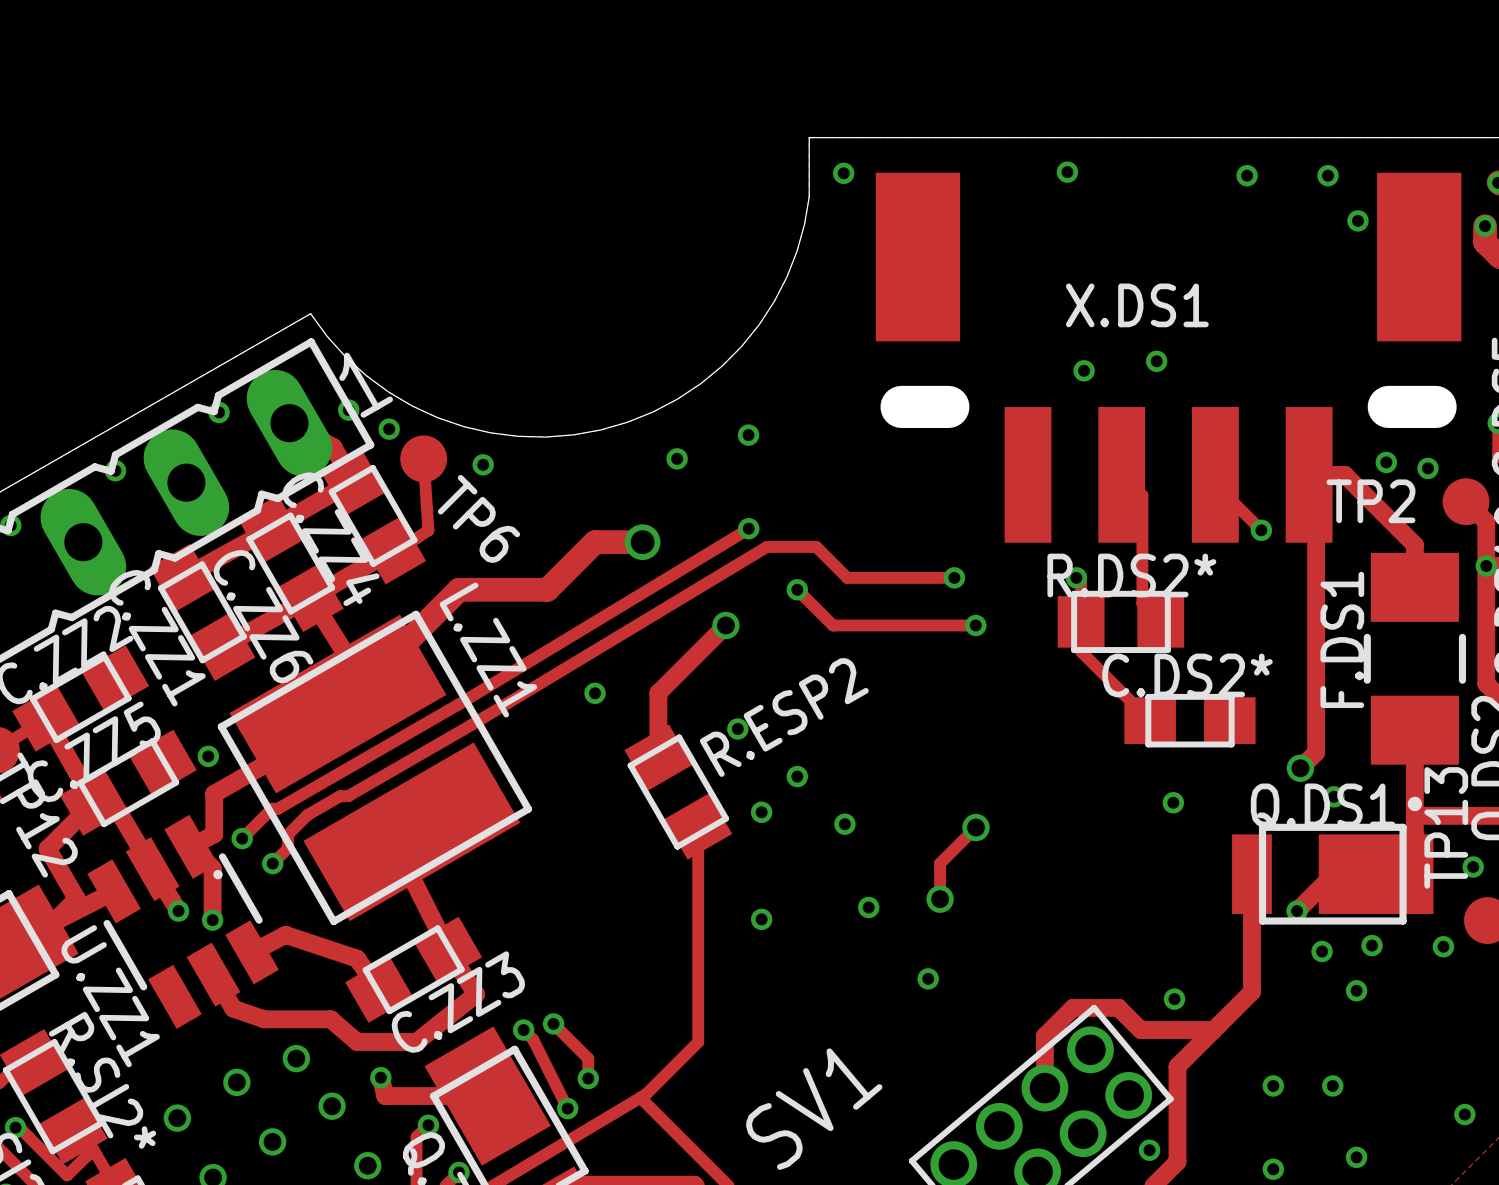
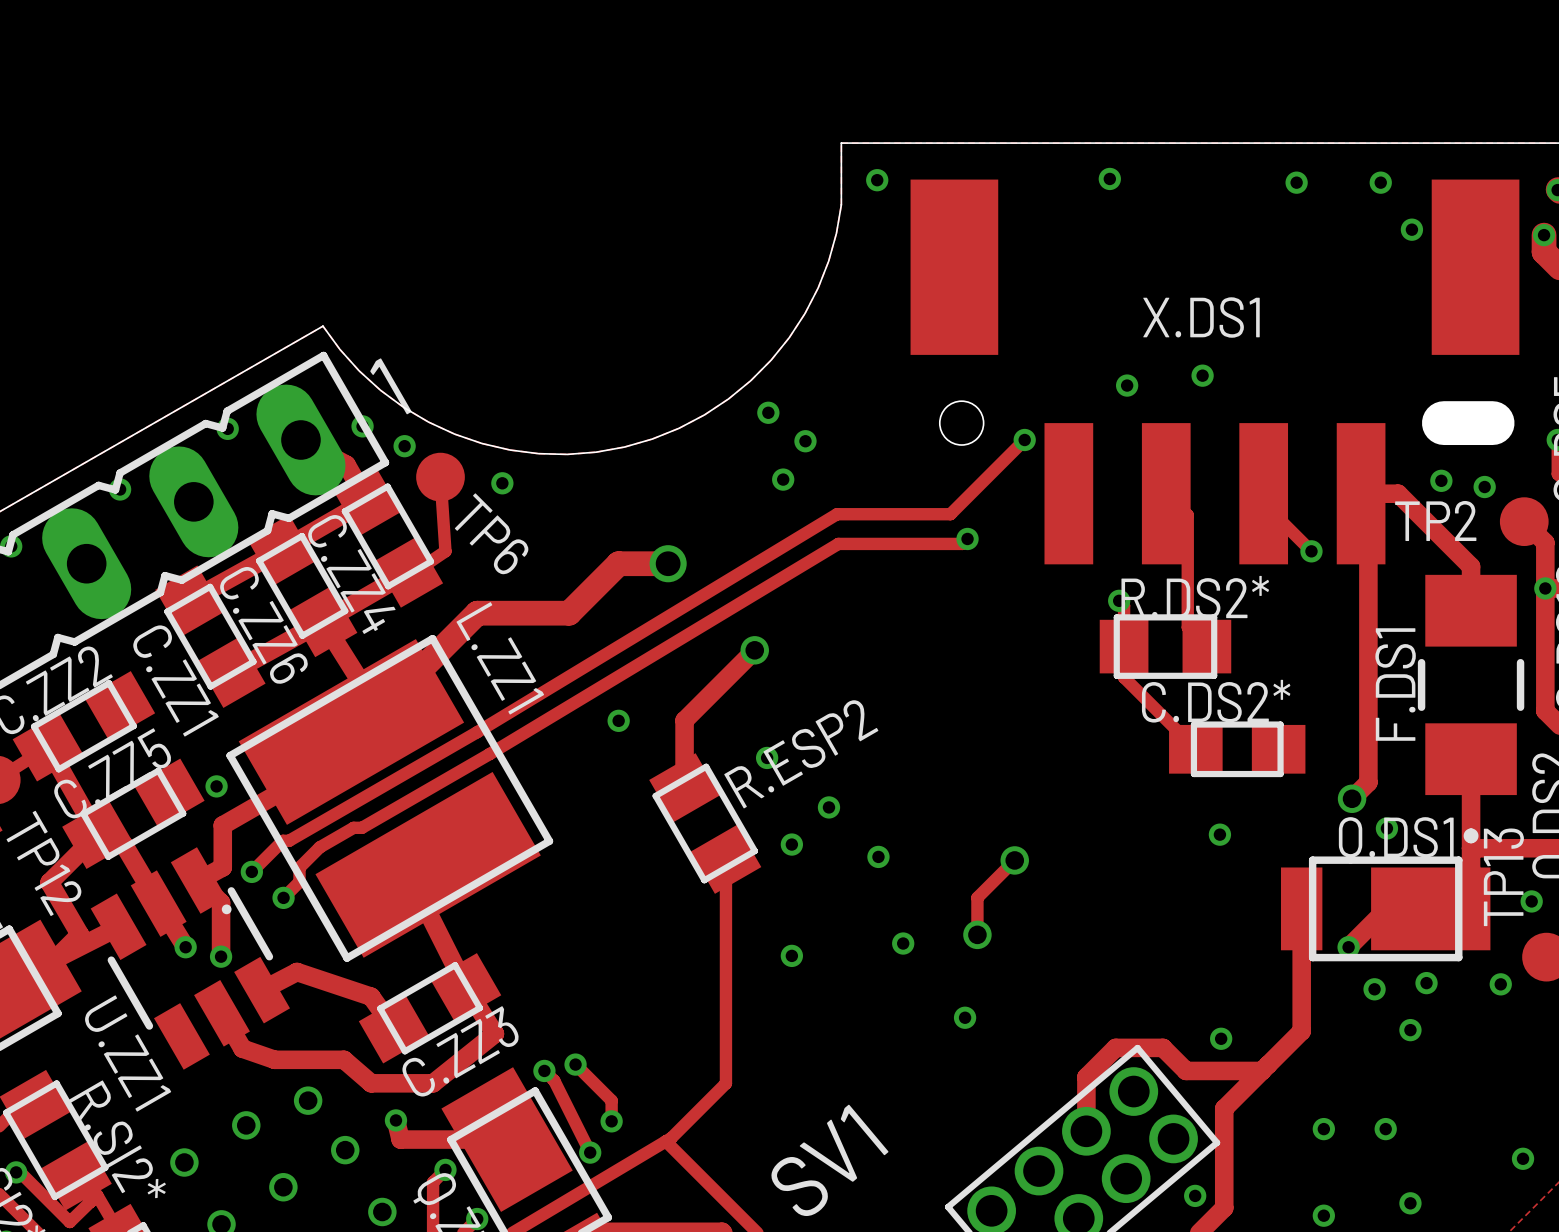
X.DS1 footprint: [875, 172, 1462, 543] -> [910, 179, 1520, 565]
via: none -> (768, 412)
via: none -> (1024, 439)
via: none -> (805, 441)
via: (748, 435) -> none
via: (677, 458) -> none
via: none -> (783, 479)
via: none -> (967, 538)
track: (748, 528) (458, 704) -> (1024, 439) (950, 514) (837, 514) (476, 732)
via: (748, 528) -> none
track: (766, 546) (816, 546) (847, 577) (954, 577) -> (797, 568) (838, 543) (962, 543) (967, 538)
via: (954, 577) -> none
track: (797, 589) (833, 625) (975, 625) -> none
via: (797, 589) -> none
via: (975, 625) -> none

